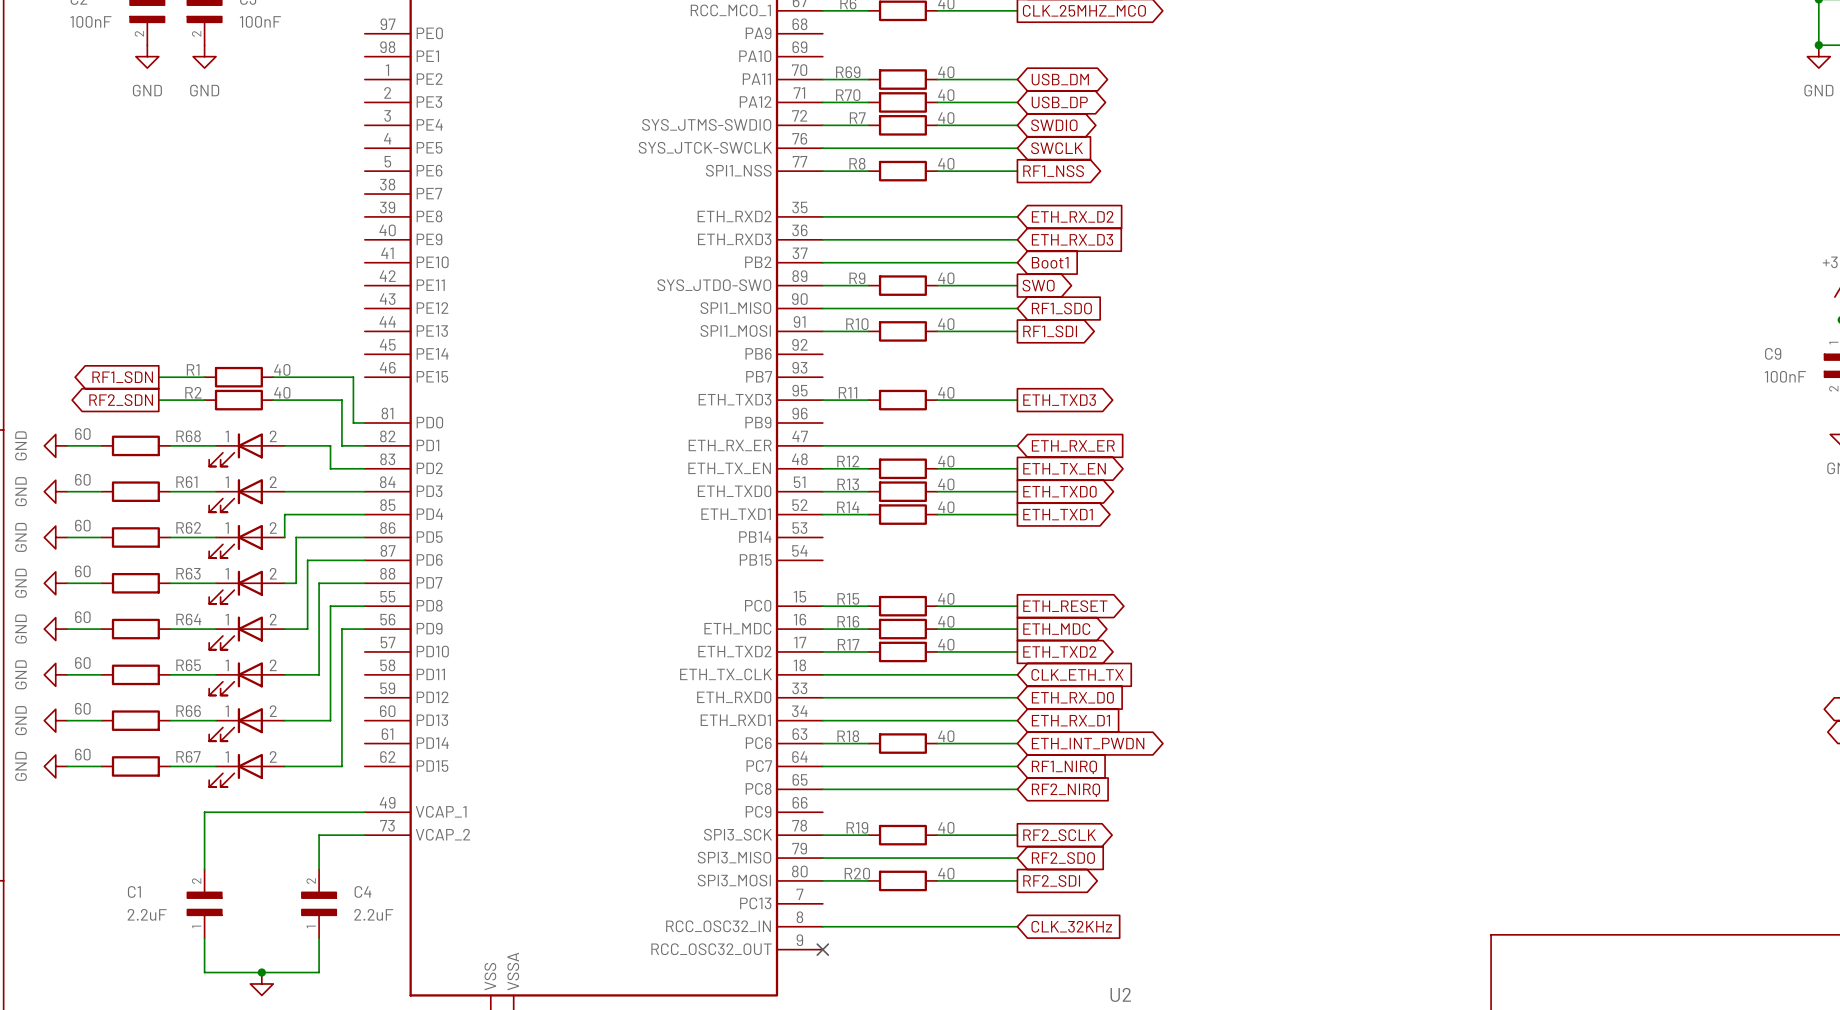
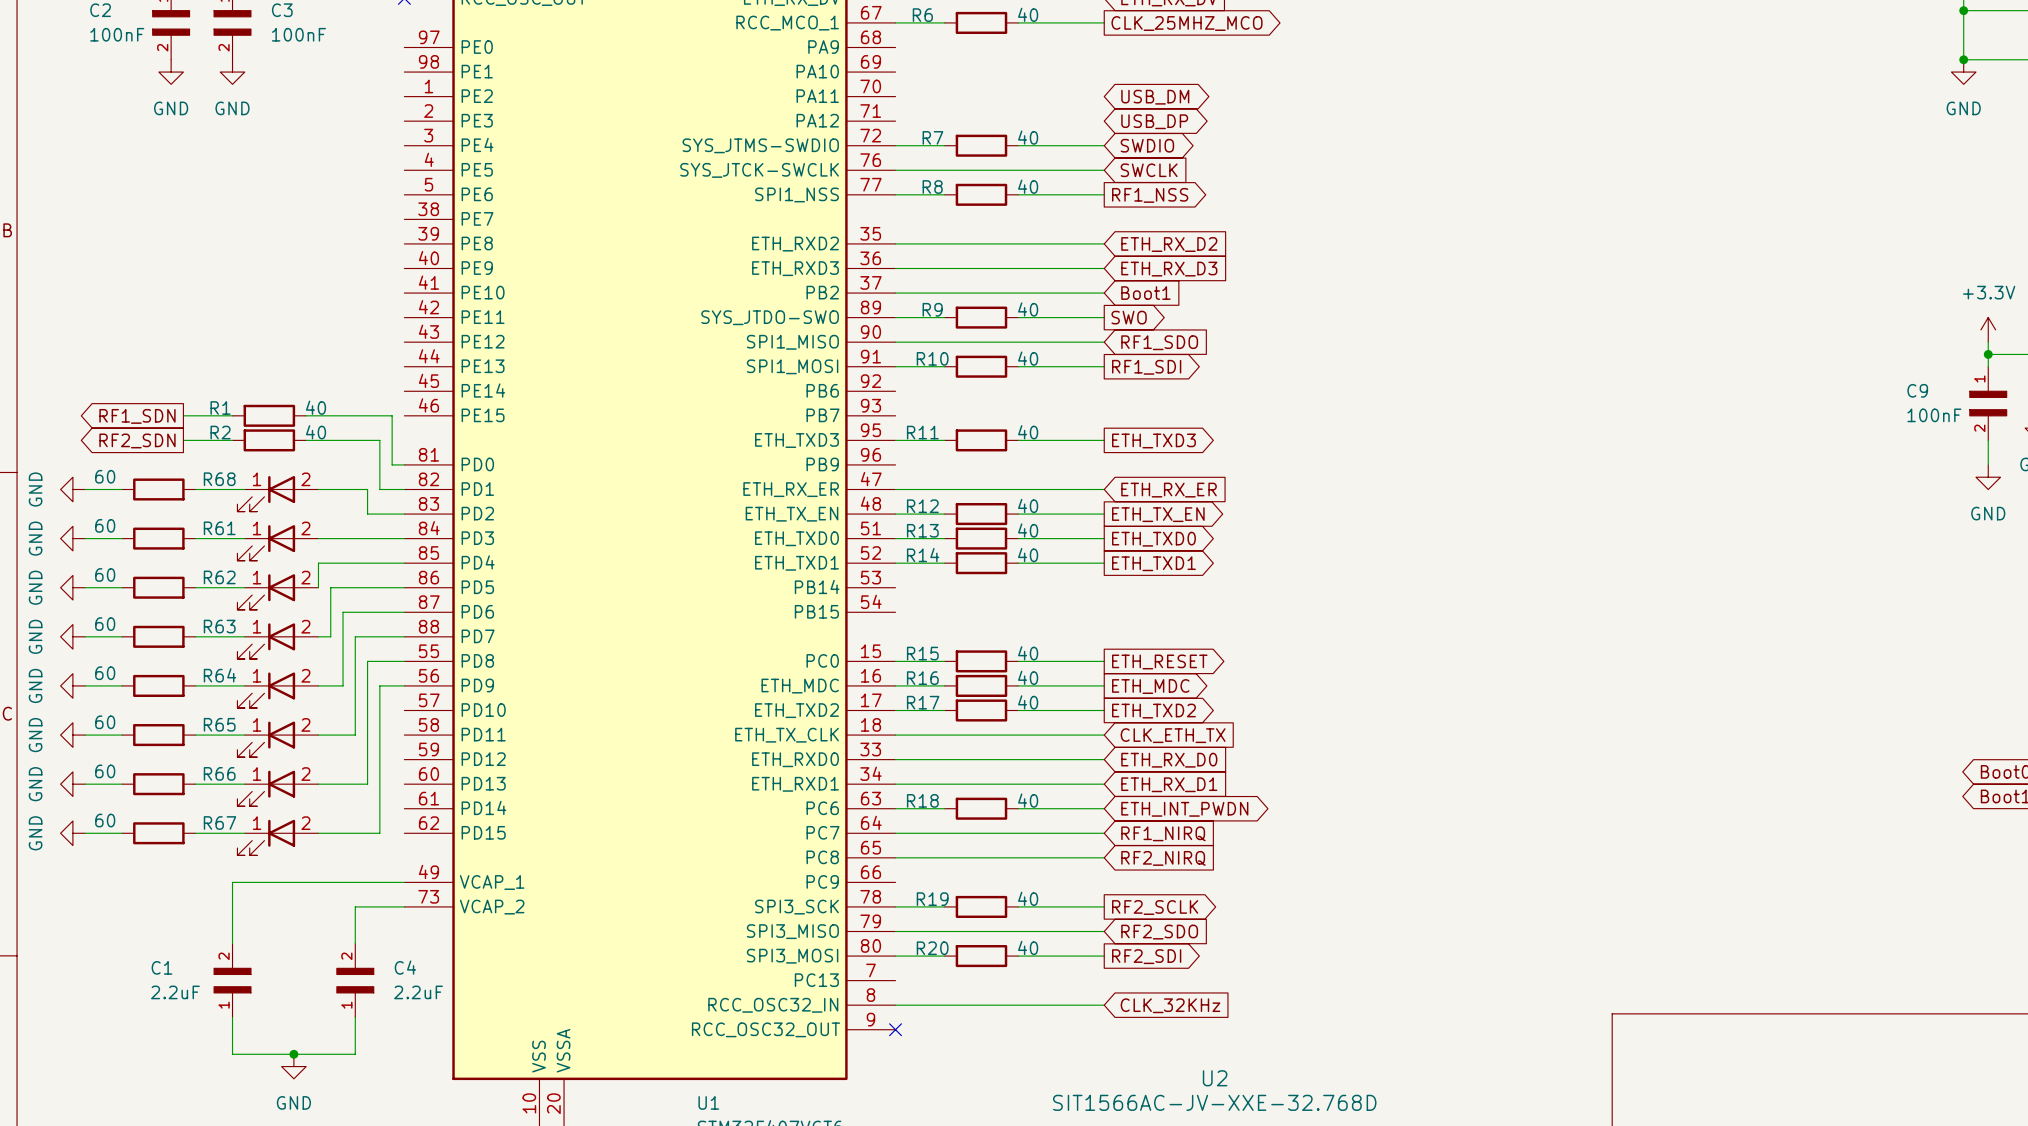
wire: (822, 79) (868, 79) -> none
R69: 40 (902, 79) -> none
wire: (937, 79) (1017, 79) -> none
wire: (822, 102) (868, 102) -> none
R70: 40 (902, 102) -> none
wire: (937, 102) (1017, 102) -> none

